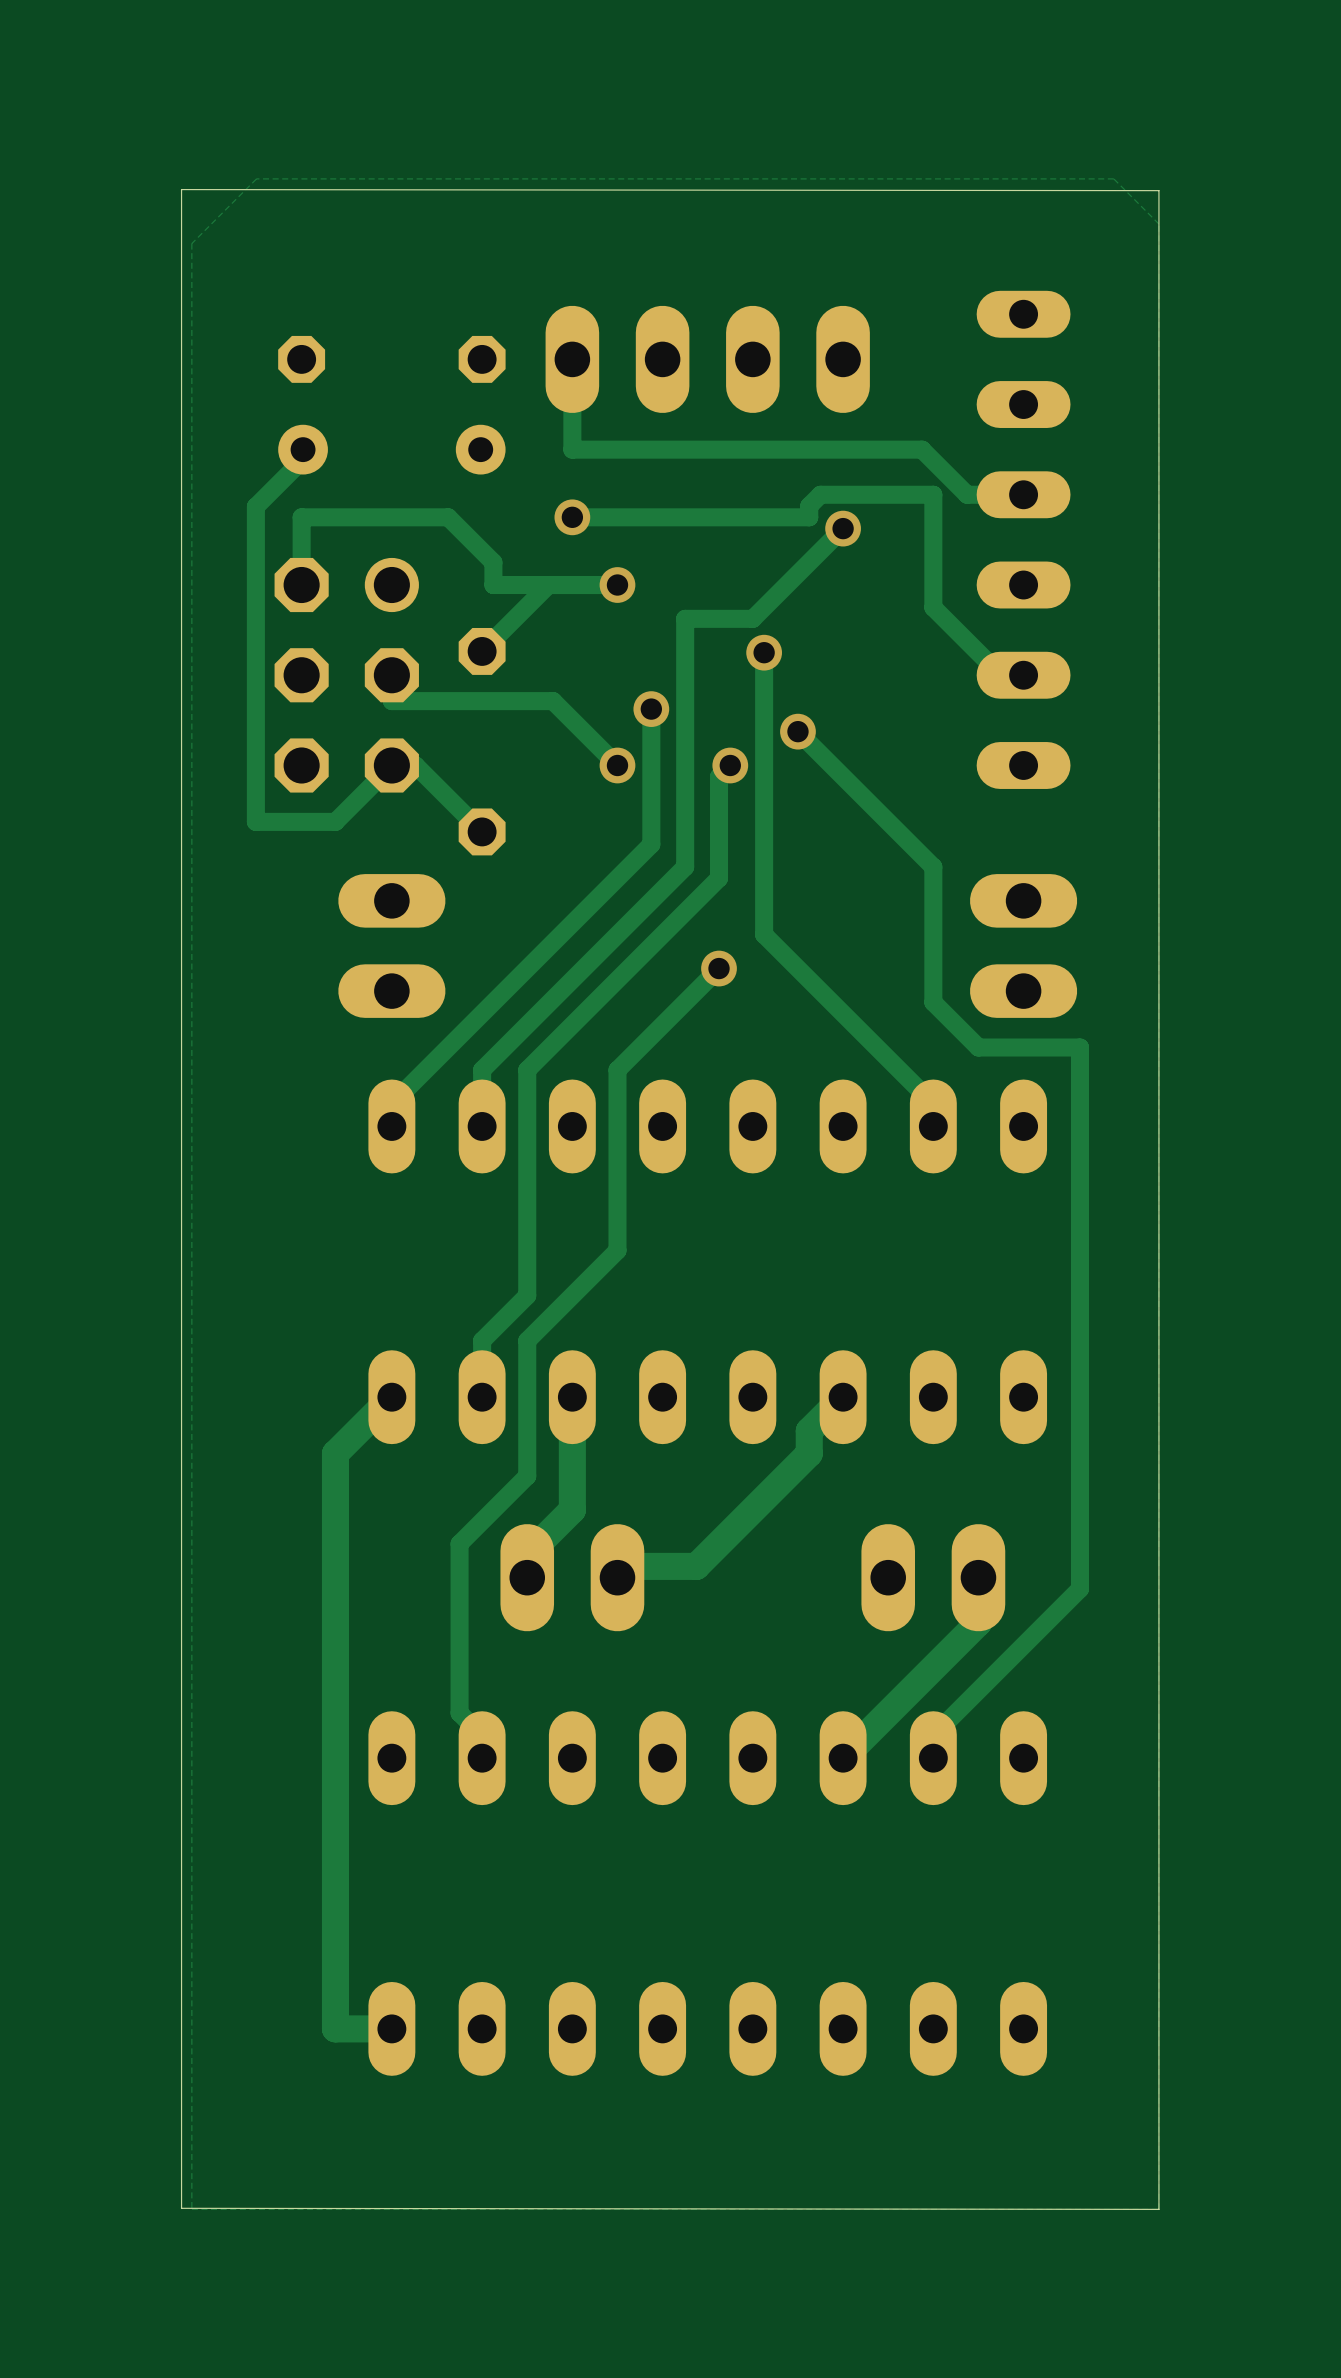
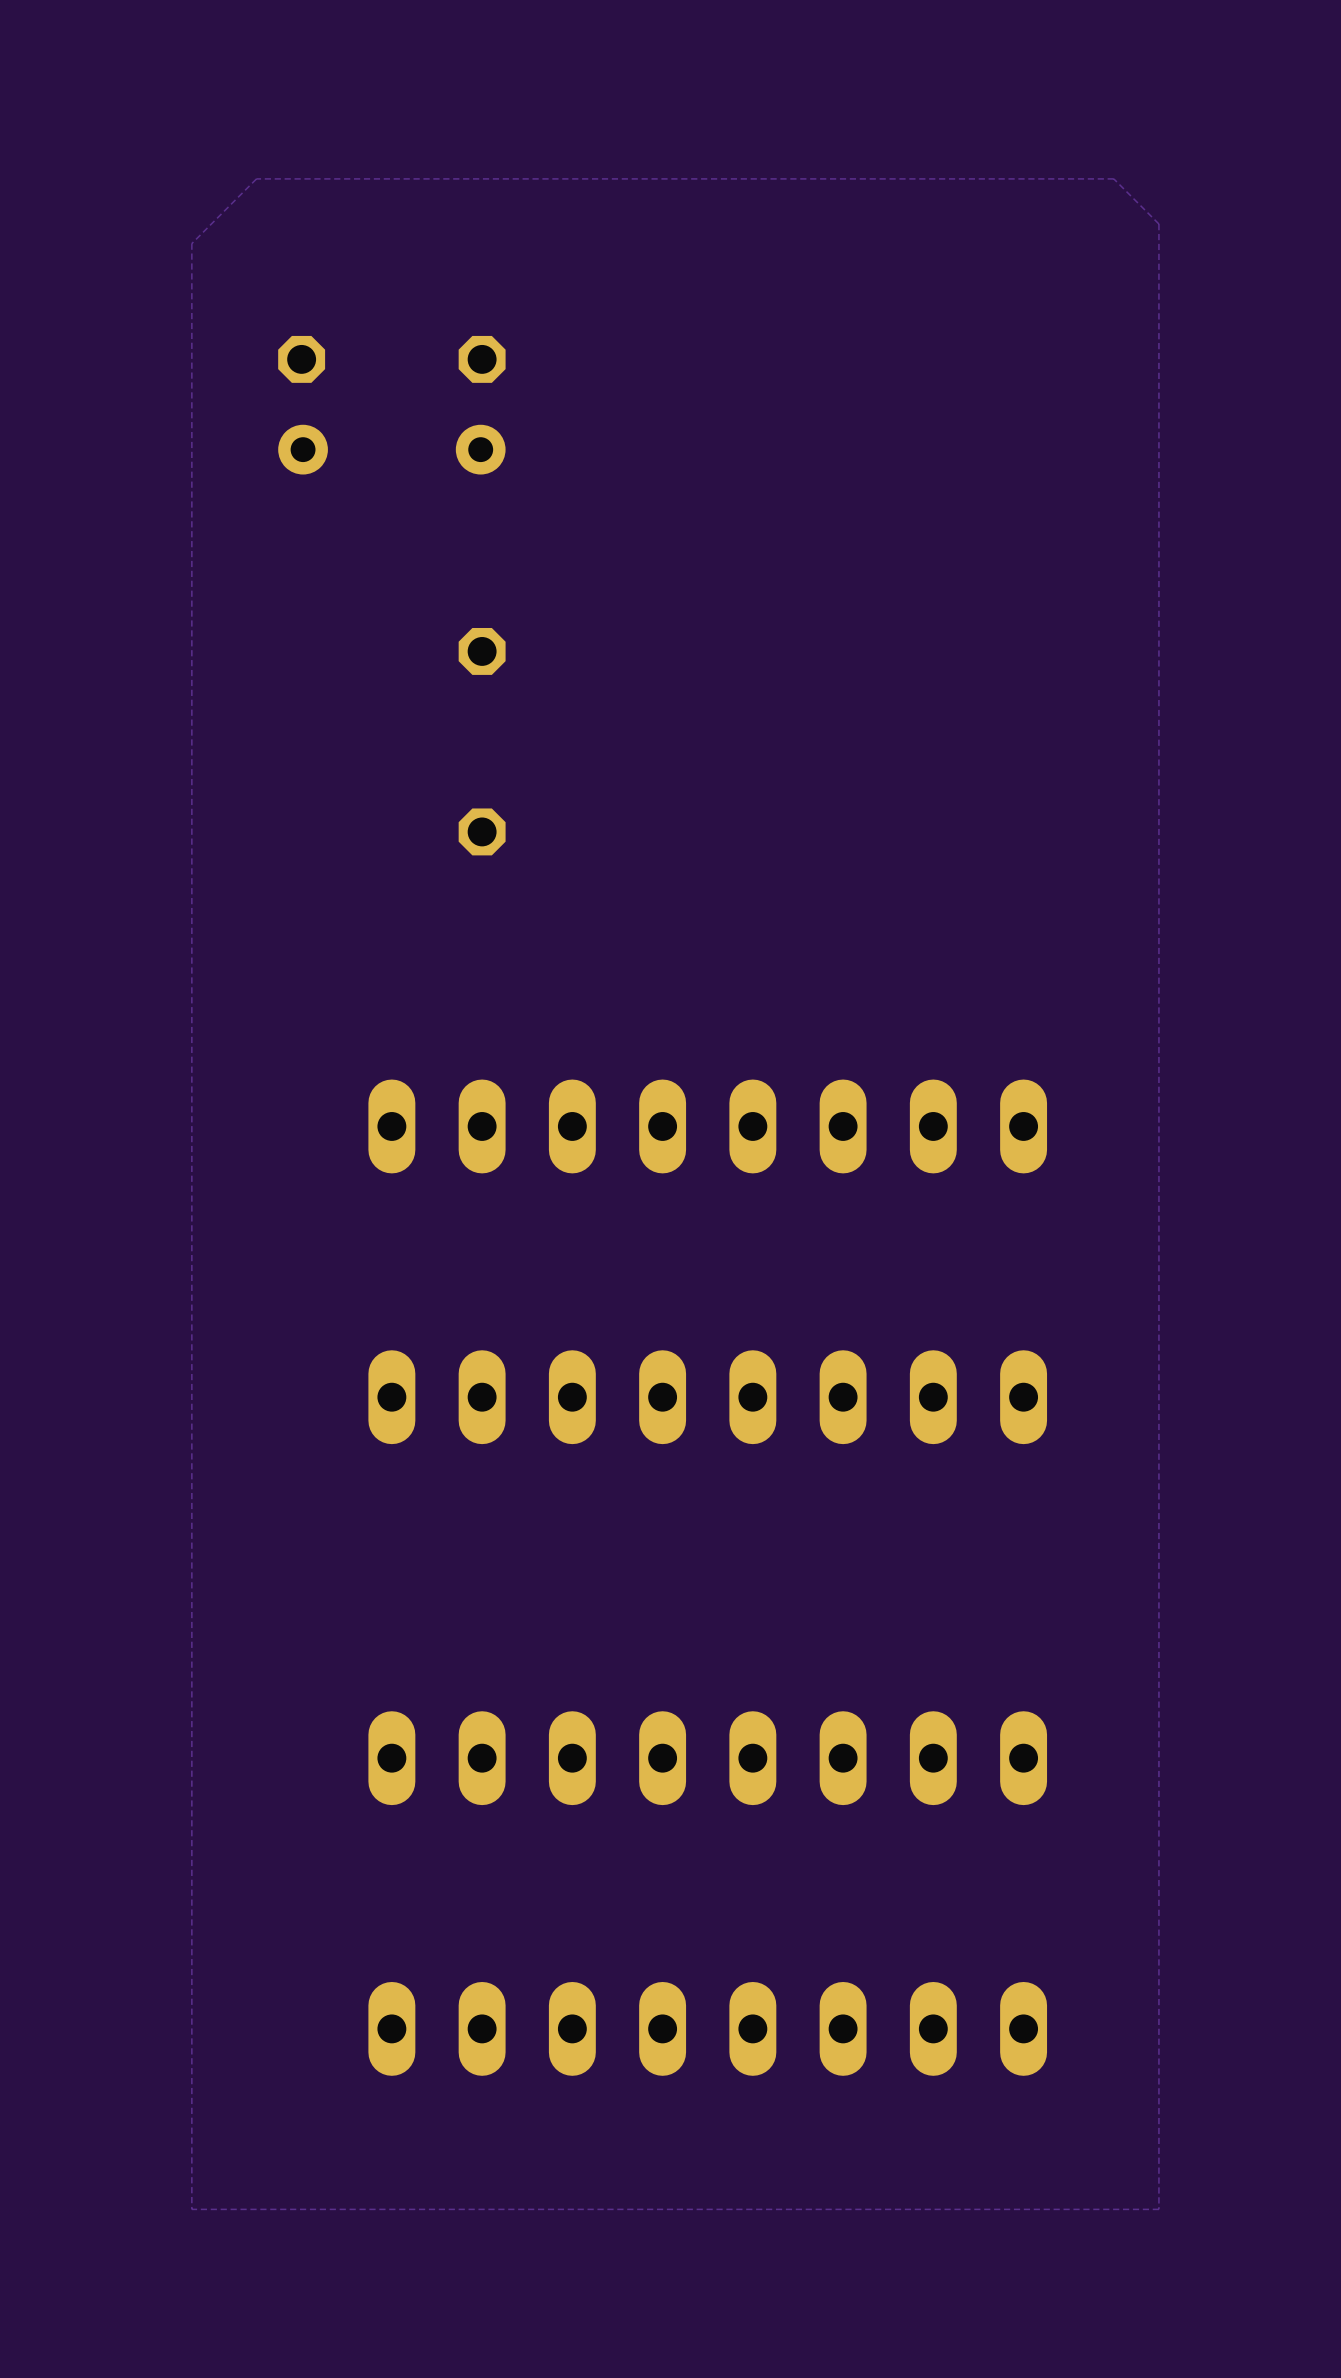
board edge: (181, 189) (181, 2208) (1158, 2209) (1158, 190) (181, 189) -> none
track: (572, 359) (572, 449) (922, 449) (967, 494) (1023, 494) -> none
part: (707, 359) -> none
part: (1023, 404) -> none
track: (303, 449) (301, 460) (255, 506) (255, 821) (335, 821) (391, 765) (415, 765) (482, 831) -> none
track: (572, 517) (809, 517) (809, 506) (820, 494) (933, 494) (933, 607) (1001, 675) (1023, 675) -> none
via: (572, 517) -> none
track: (843, 528) (752, 618) (685, 618) (685, 867) (482, 1070) (482, 1126) -> none
via: (843, 528) -> none
track: (548, 585) (482, 651) -> none
track: (617, 585) (493, 585) (493, 562) (448, 517) (301, 517) (301, 585) -> none
via: (617, 585) -> none
track: (764, 652) (764, 934) (933, 1103) (933, 1126) -> none
via: (764, 652) -> none
part: (346, 675) -> none
track: (391, 675) (391, 701) (553, 701) (617, 765) -> none
part: (1023, 675) -> none
track: (651, 709) (651, 844) (391, 1103) (391, 1126) -> none
via: (651, 709) -> none
track: (797, 731) (933, 867) (933, 1002) (978, 1047) (1079, 1047) (1079, 1588) (933, 1735) (933, 1758) -> none
via: (797, 731) -> none
via: (617, 765) -> none
track: (730, 765) (719, 776) (719, 878) (527, 1070) (527, 1295) (482, 1340) (482, 1397) -> none
via: (730, 765) -> none
part: (391, 945) -> none
part: (1023, 945) -> none
track: (719, 968) (617, 1070) (617, 1250) (527, 1340) (527, 1476) (459, 1543) (459, 1713) (482, 1735) (482, 1758) -> none
via: (719, 968) -> none
track: (391, 1397) (335, 1453) (335, 2028) (391, 2028) -> none
track: (572, 1397) (572, 1510) (527, 1555) (527, 1577) -> none
track: (843, 1397) (809, 1431) (809, 1453) (696, 1566) (617, 1566) (617, 1577) -> none
part: (572, 1577) -> none
part: (933, 1577) -> none
track: (978, 1577) (978, 1622) (843, 1758) -> none

